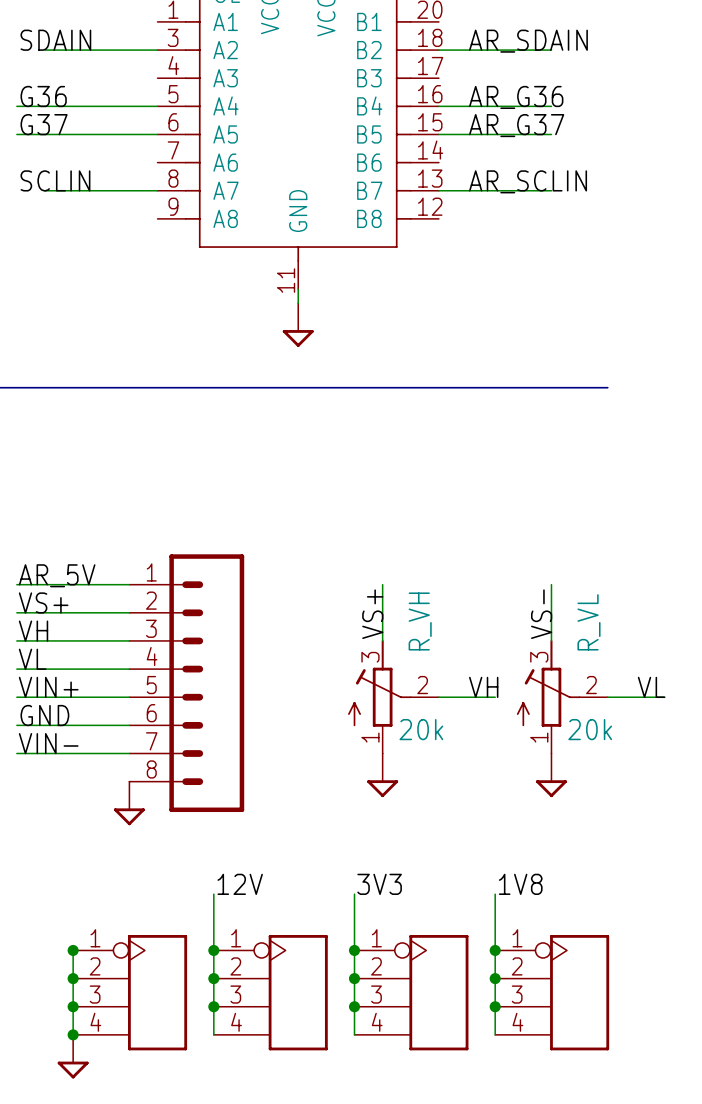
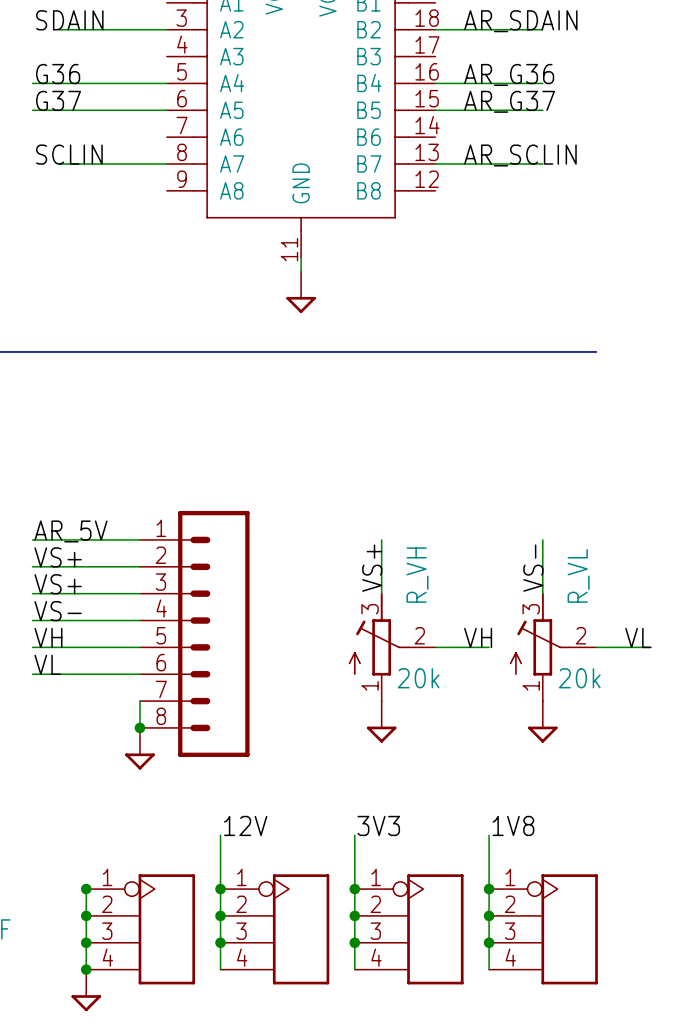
label: VH (33, 631) -> VS+ (58, 584)
label: VL (32, 659) -> VS- (58, 611)
label: VIN+ (48, 687) -> VH (48, 637)
label: GND (44, 715) -> VL (47, 664)
label: VIN- (48, 743) -> none
wire: (16, 753) (129, 753) -> (139, 727) (139, 701)
junction: none -> (139, 727)

